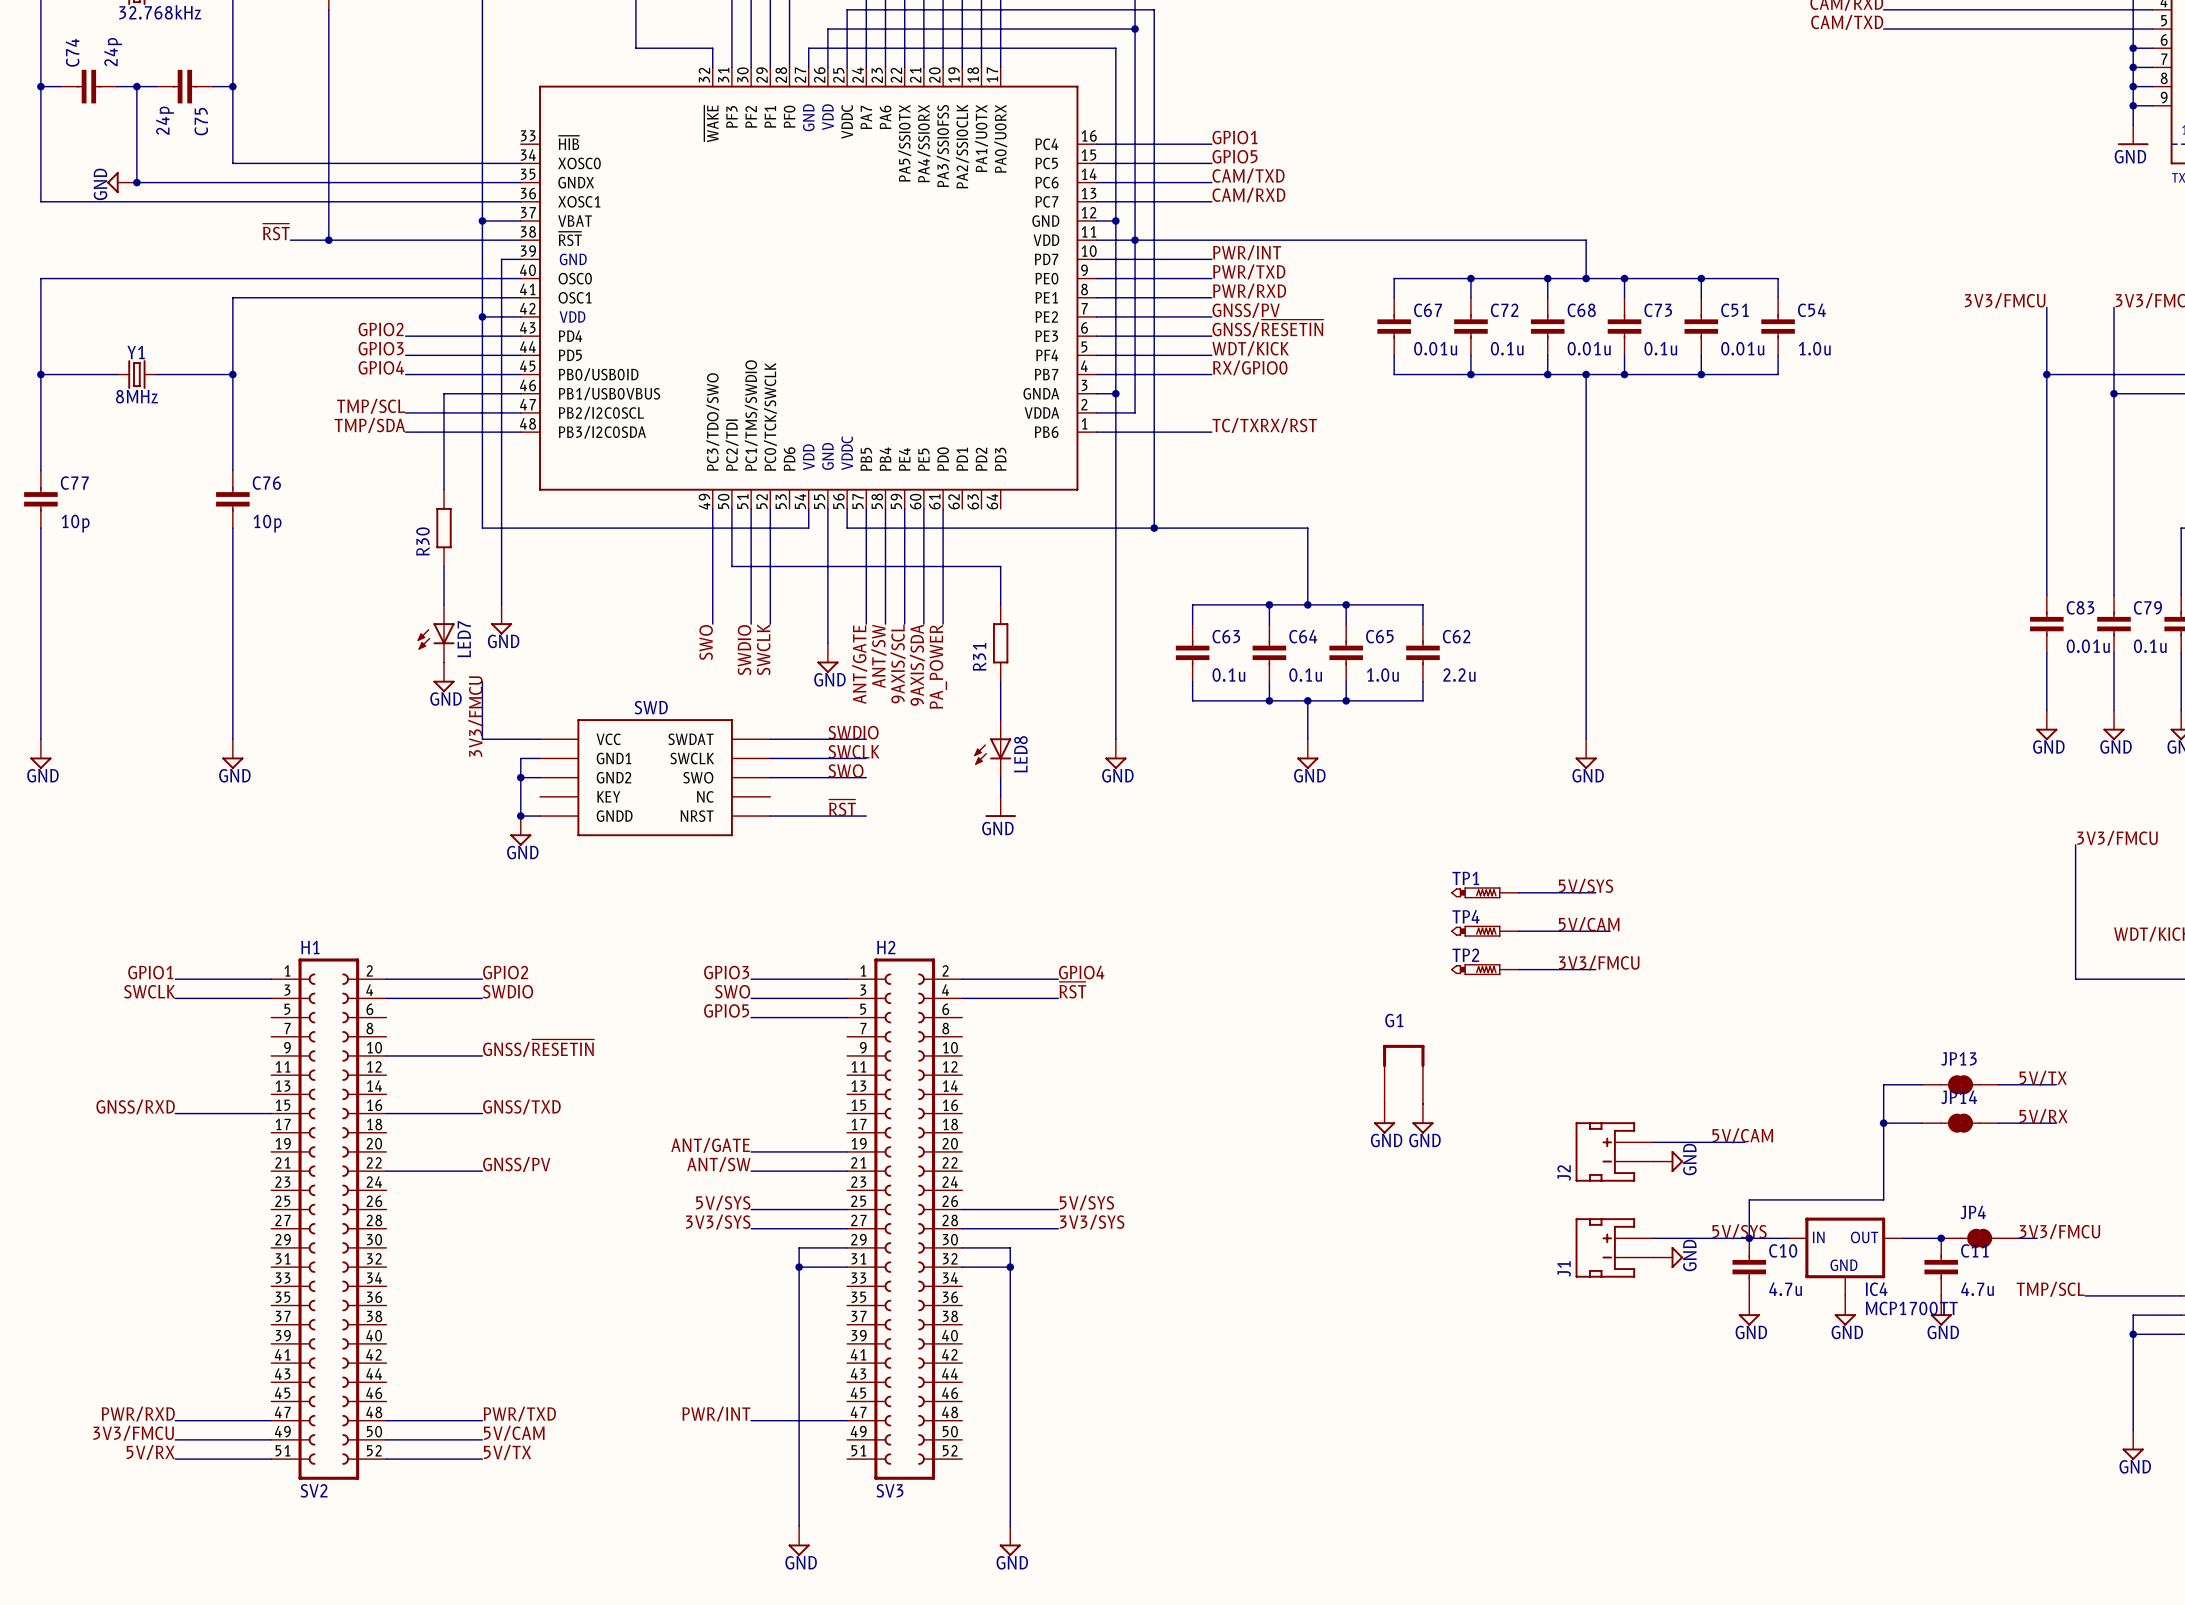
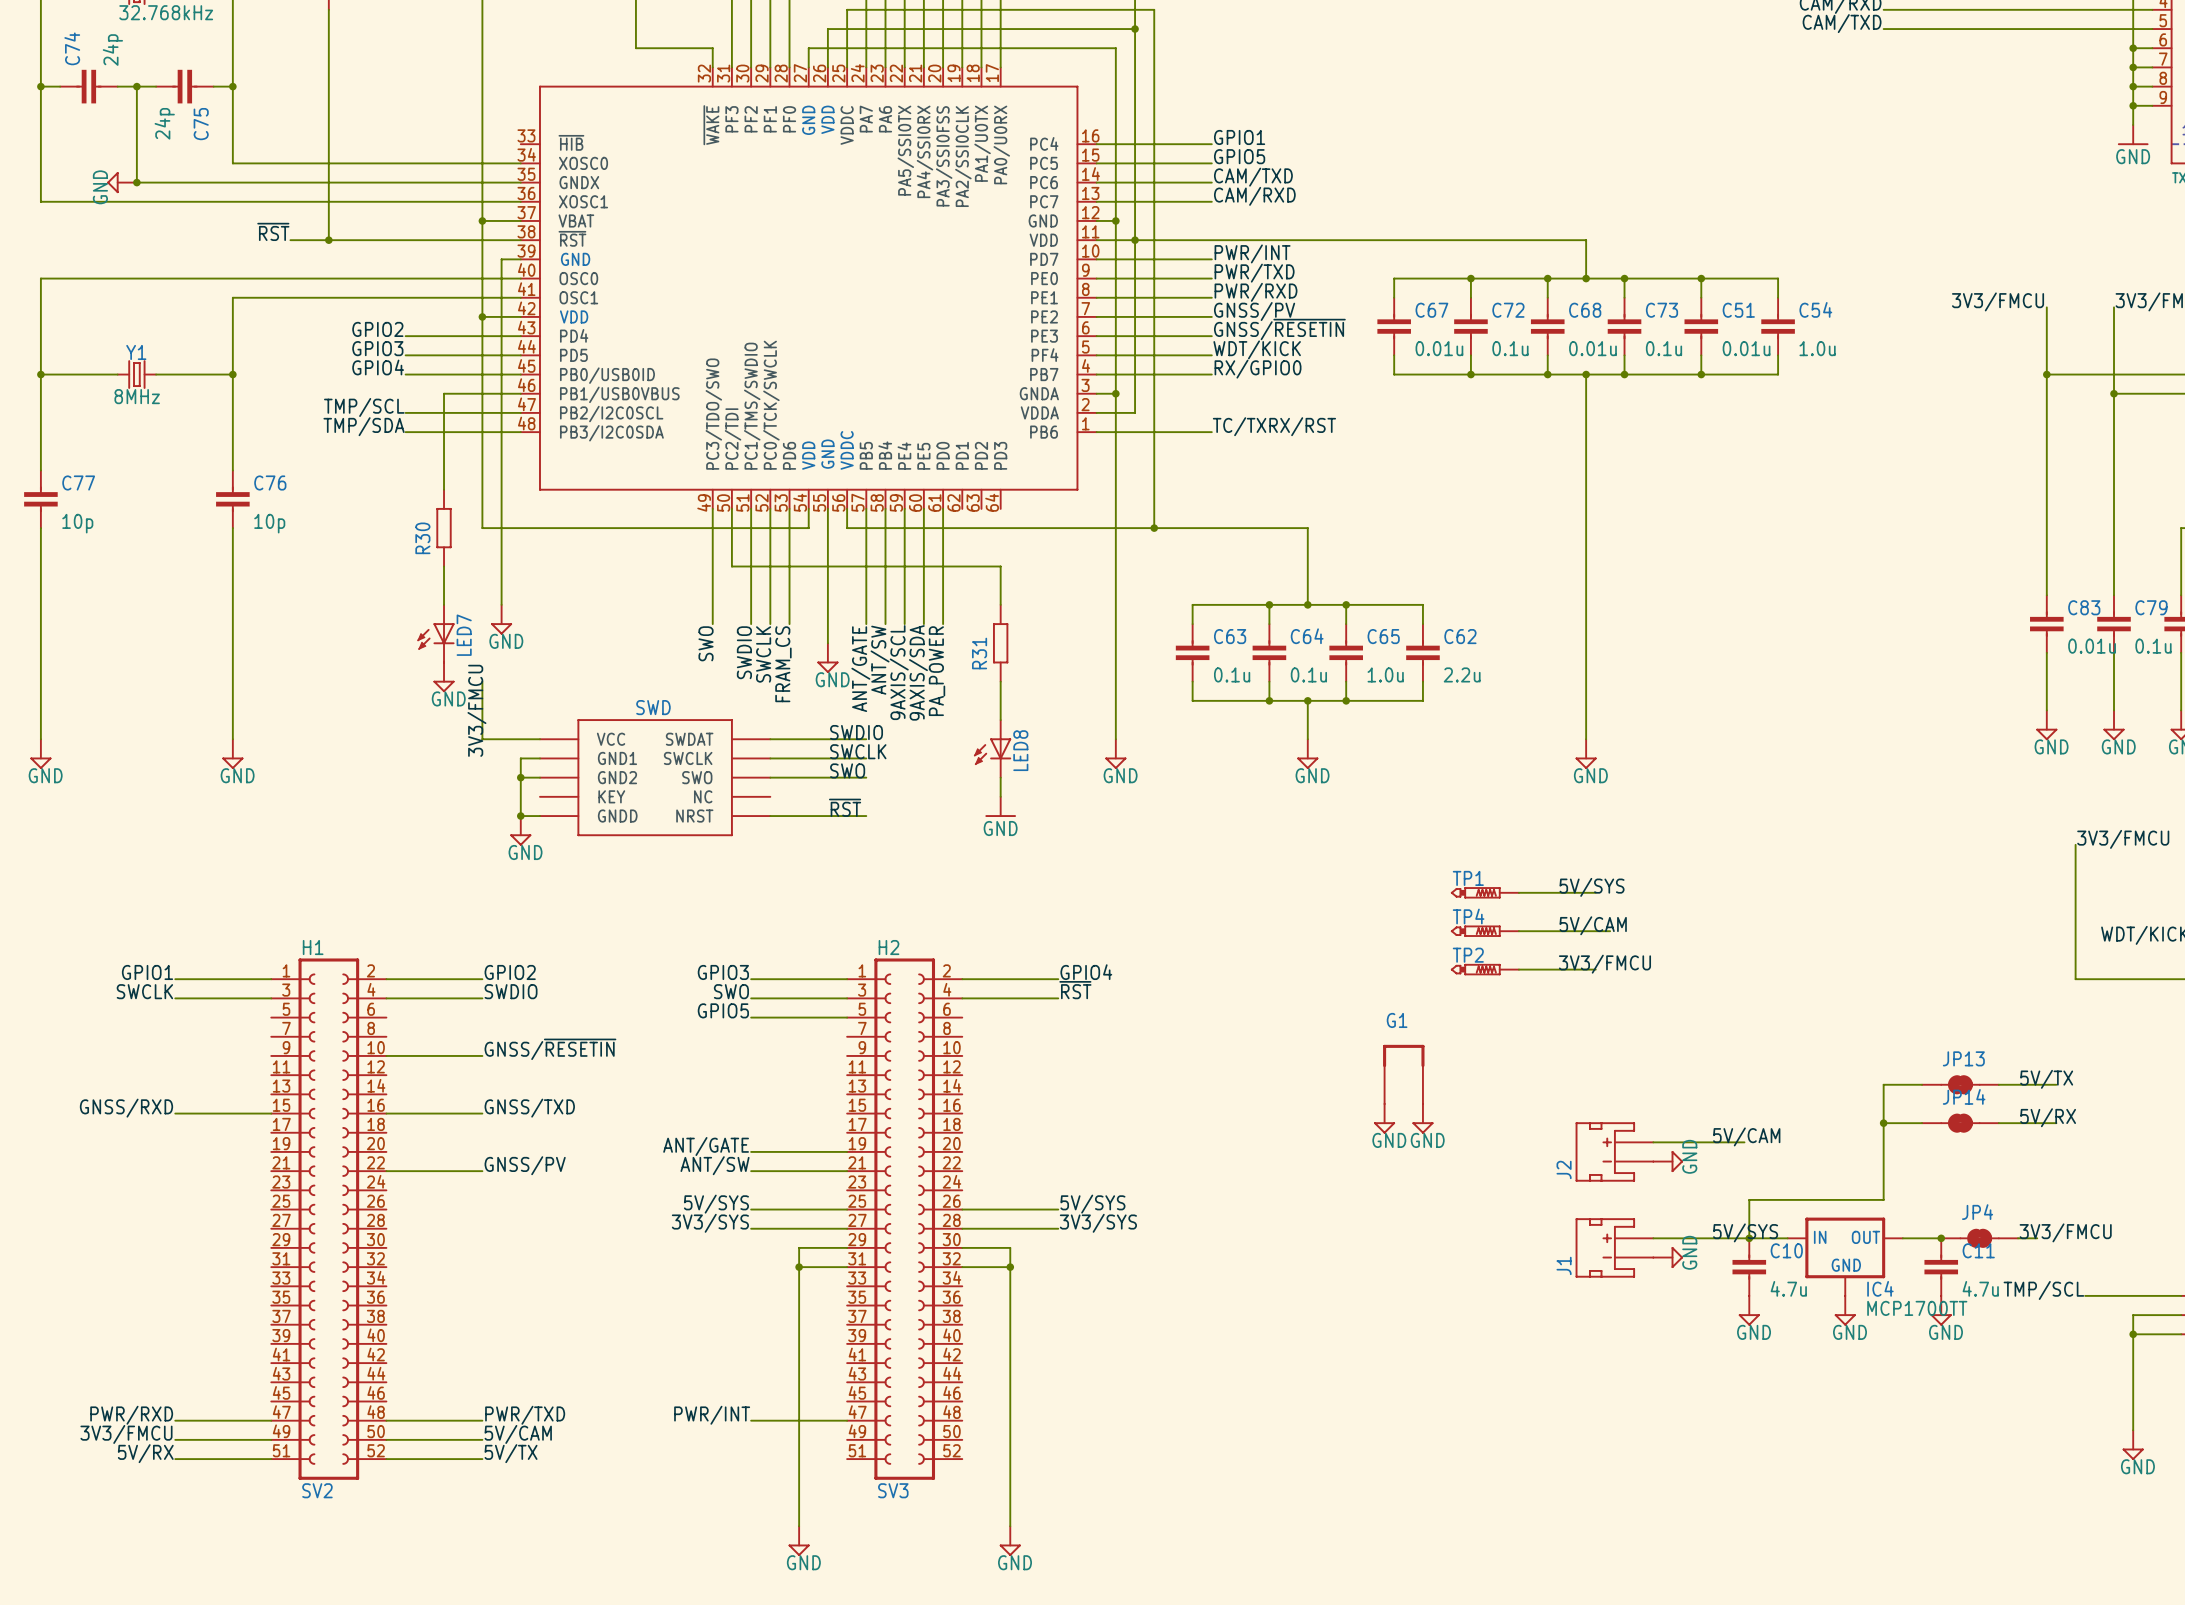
wire: none -> (789, 508) (789, 624)
label: none -> FRAM_CS (783, 664)

